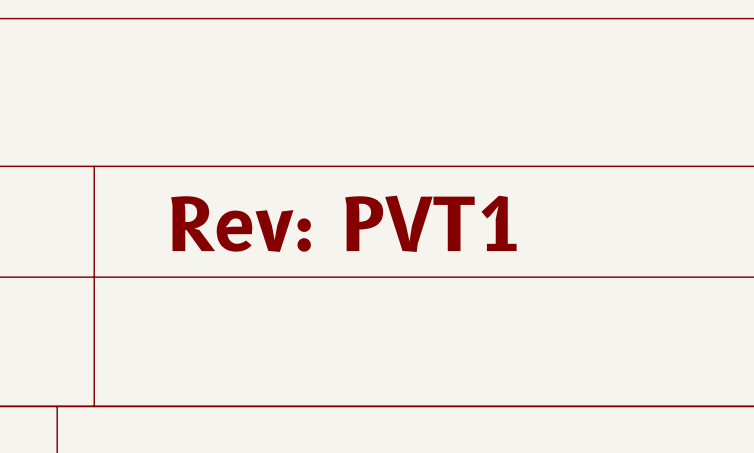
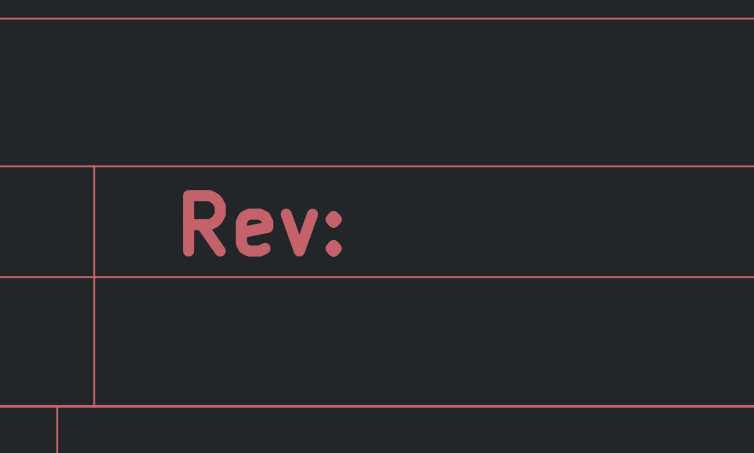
title block: Rev: PVT1 (343, 223) -> Rev: (262, 223)

